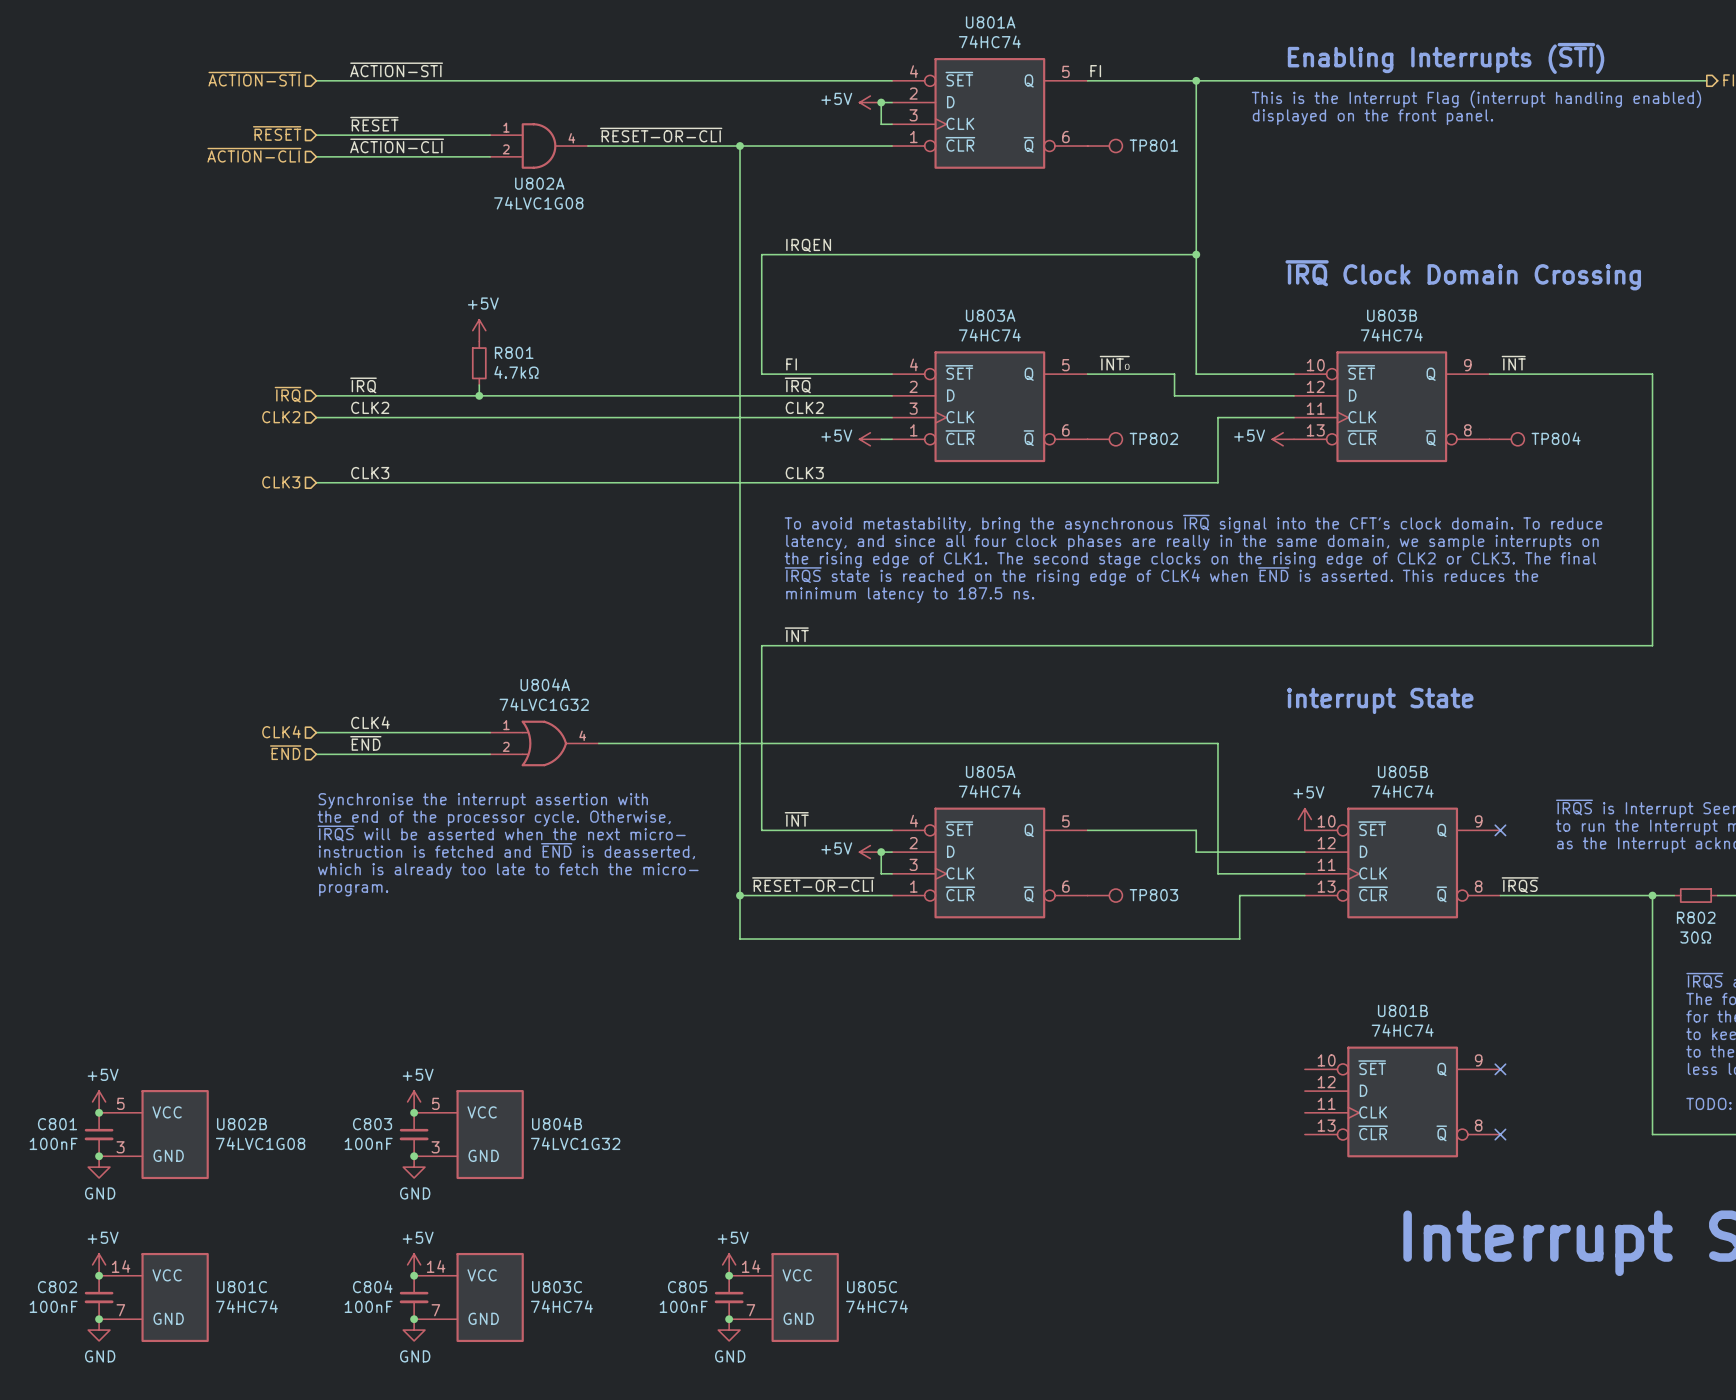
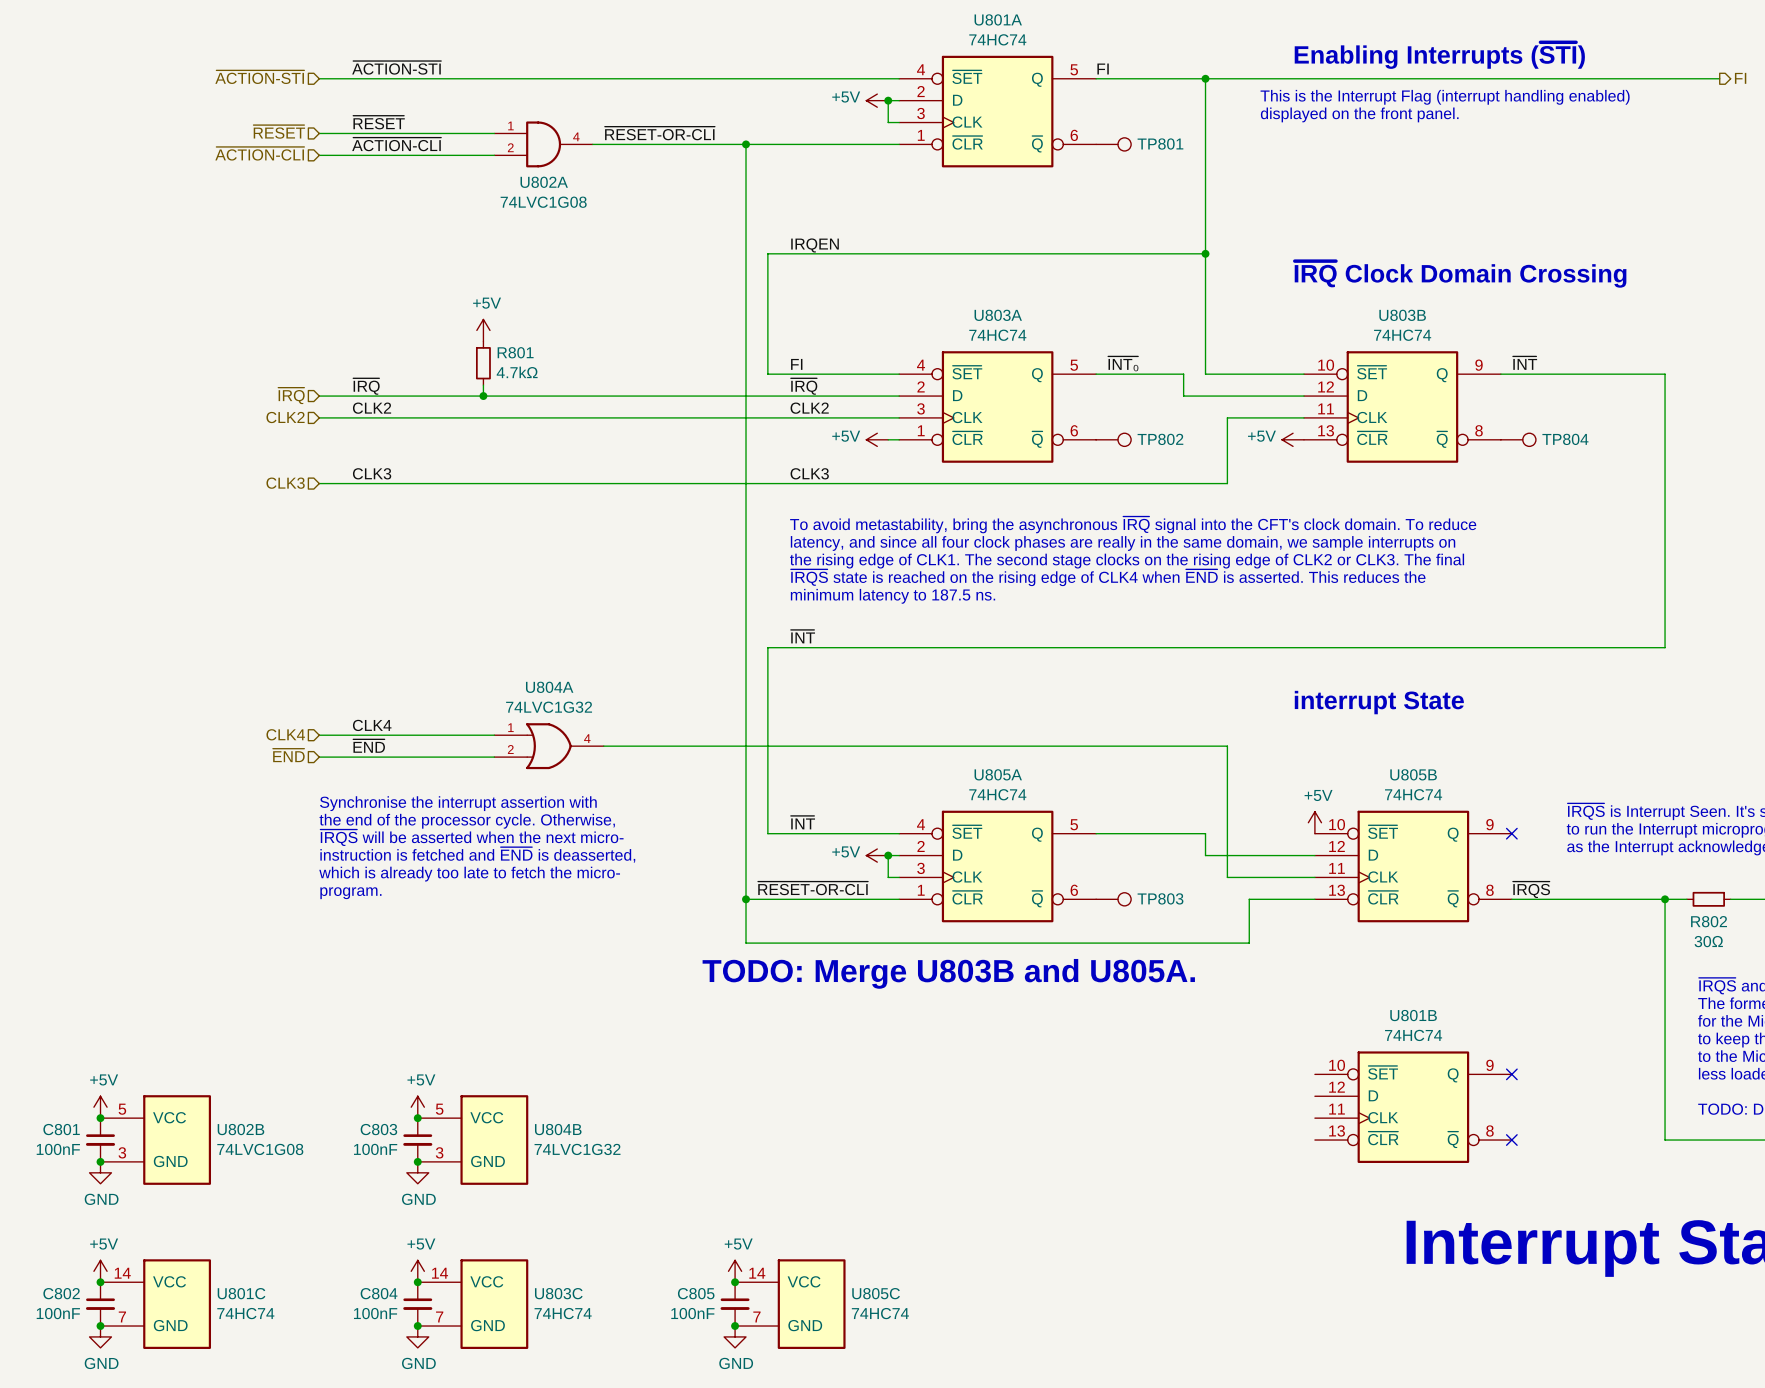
text: none -> TODO: Merge U803B and U805A. (948, 973)

